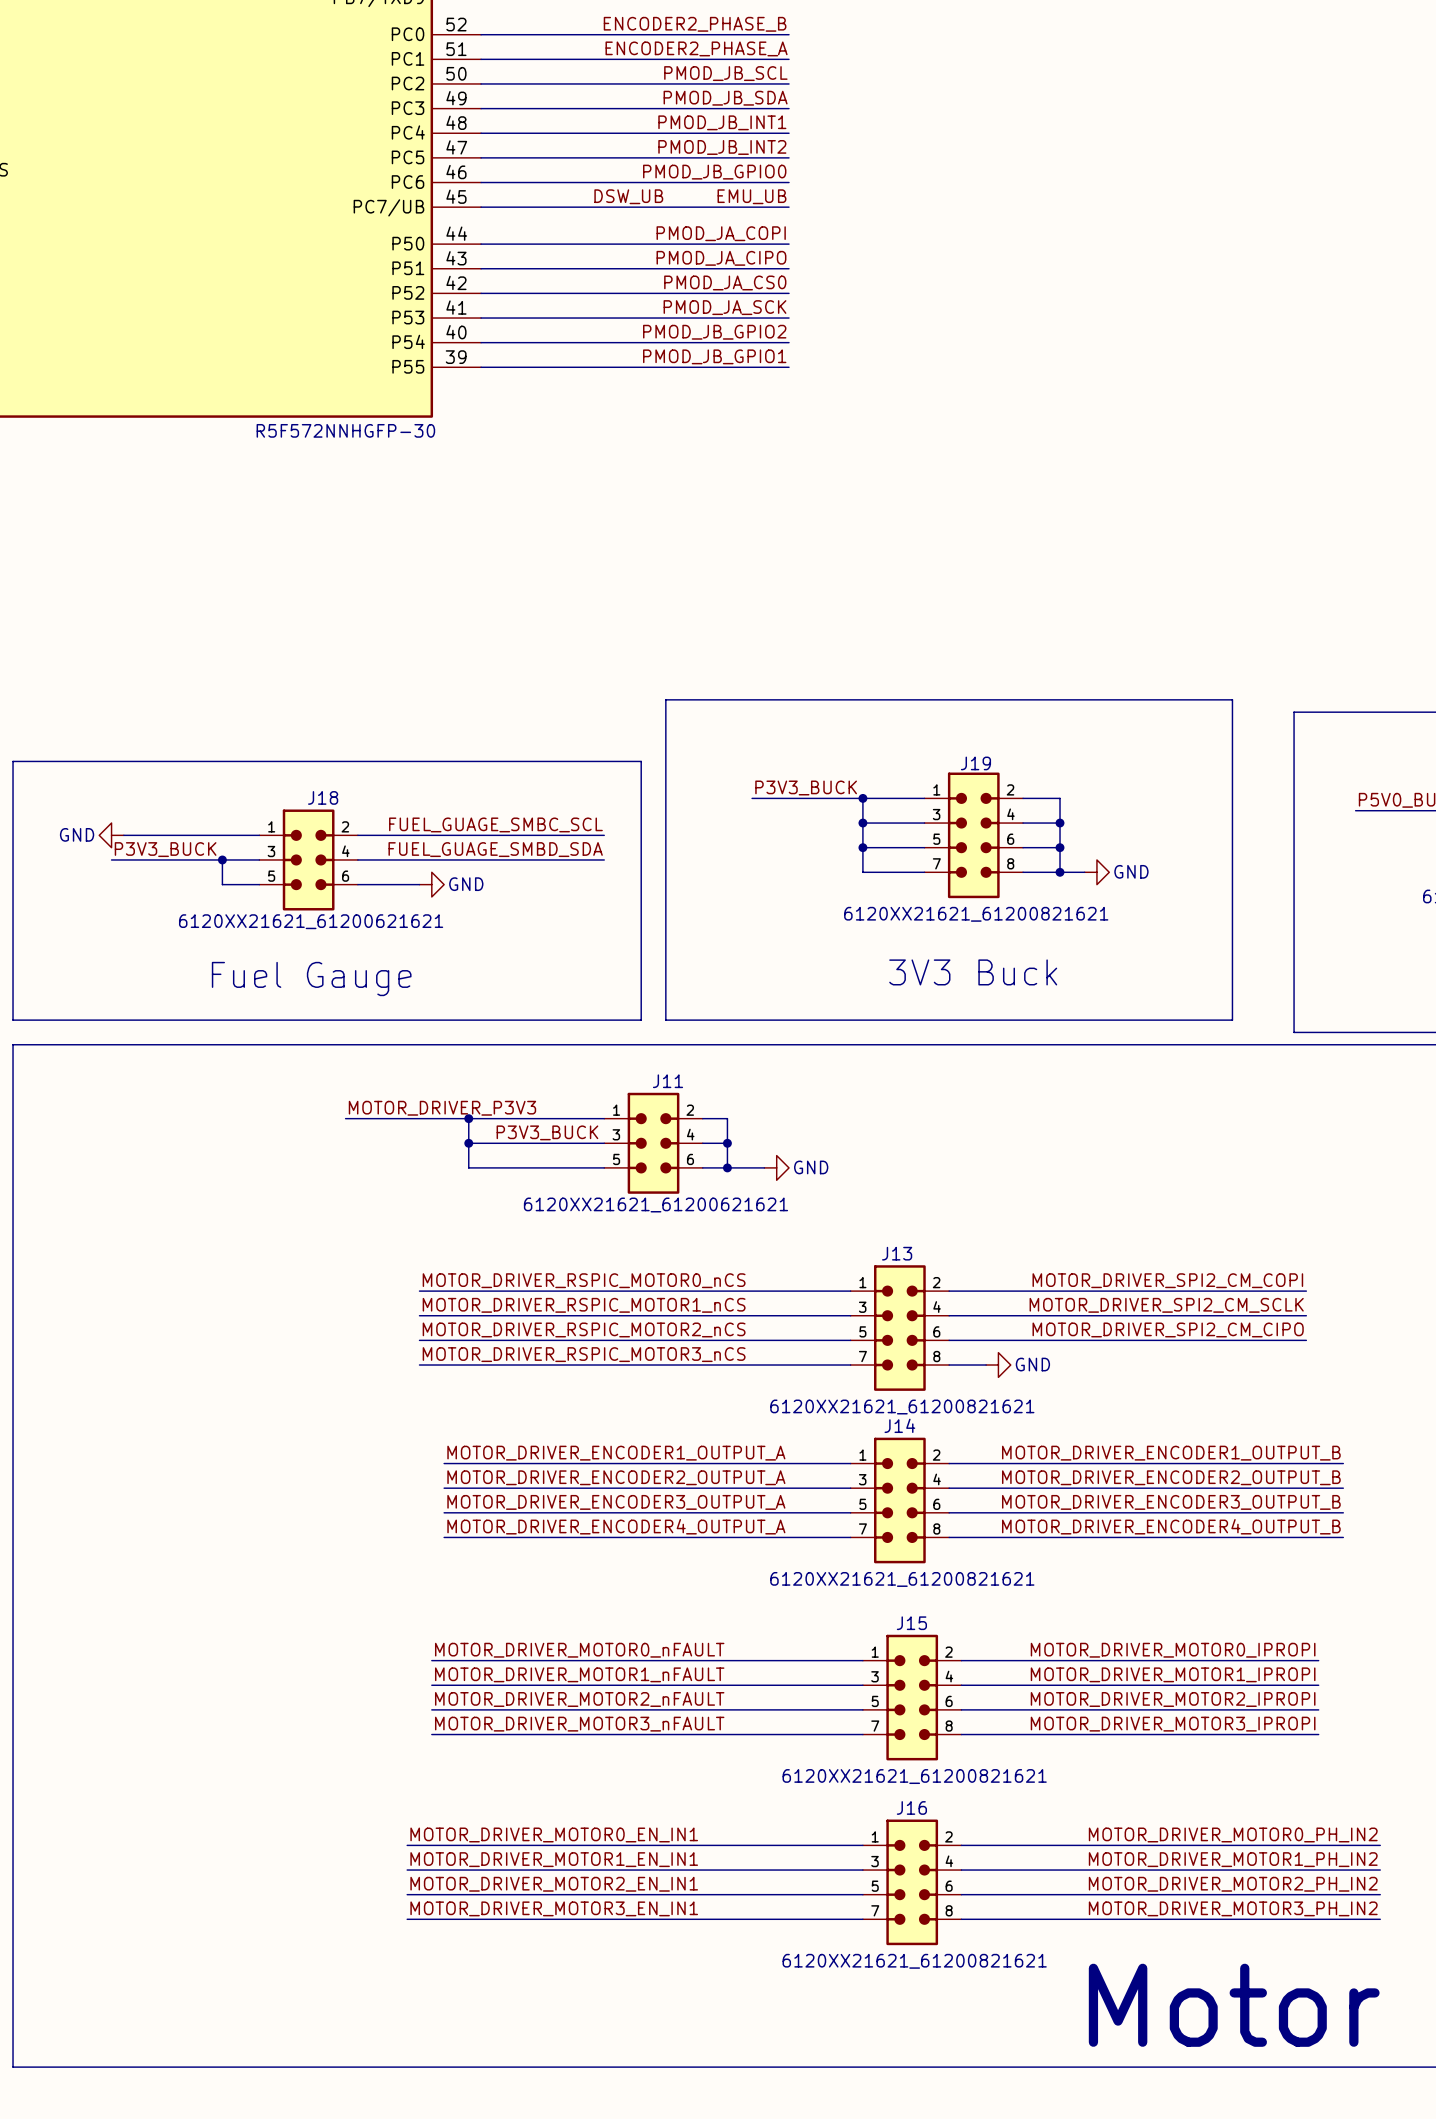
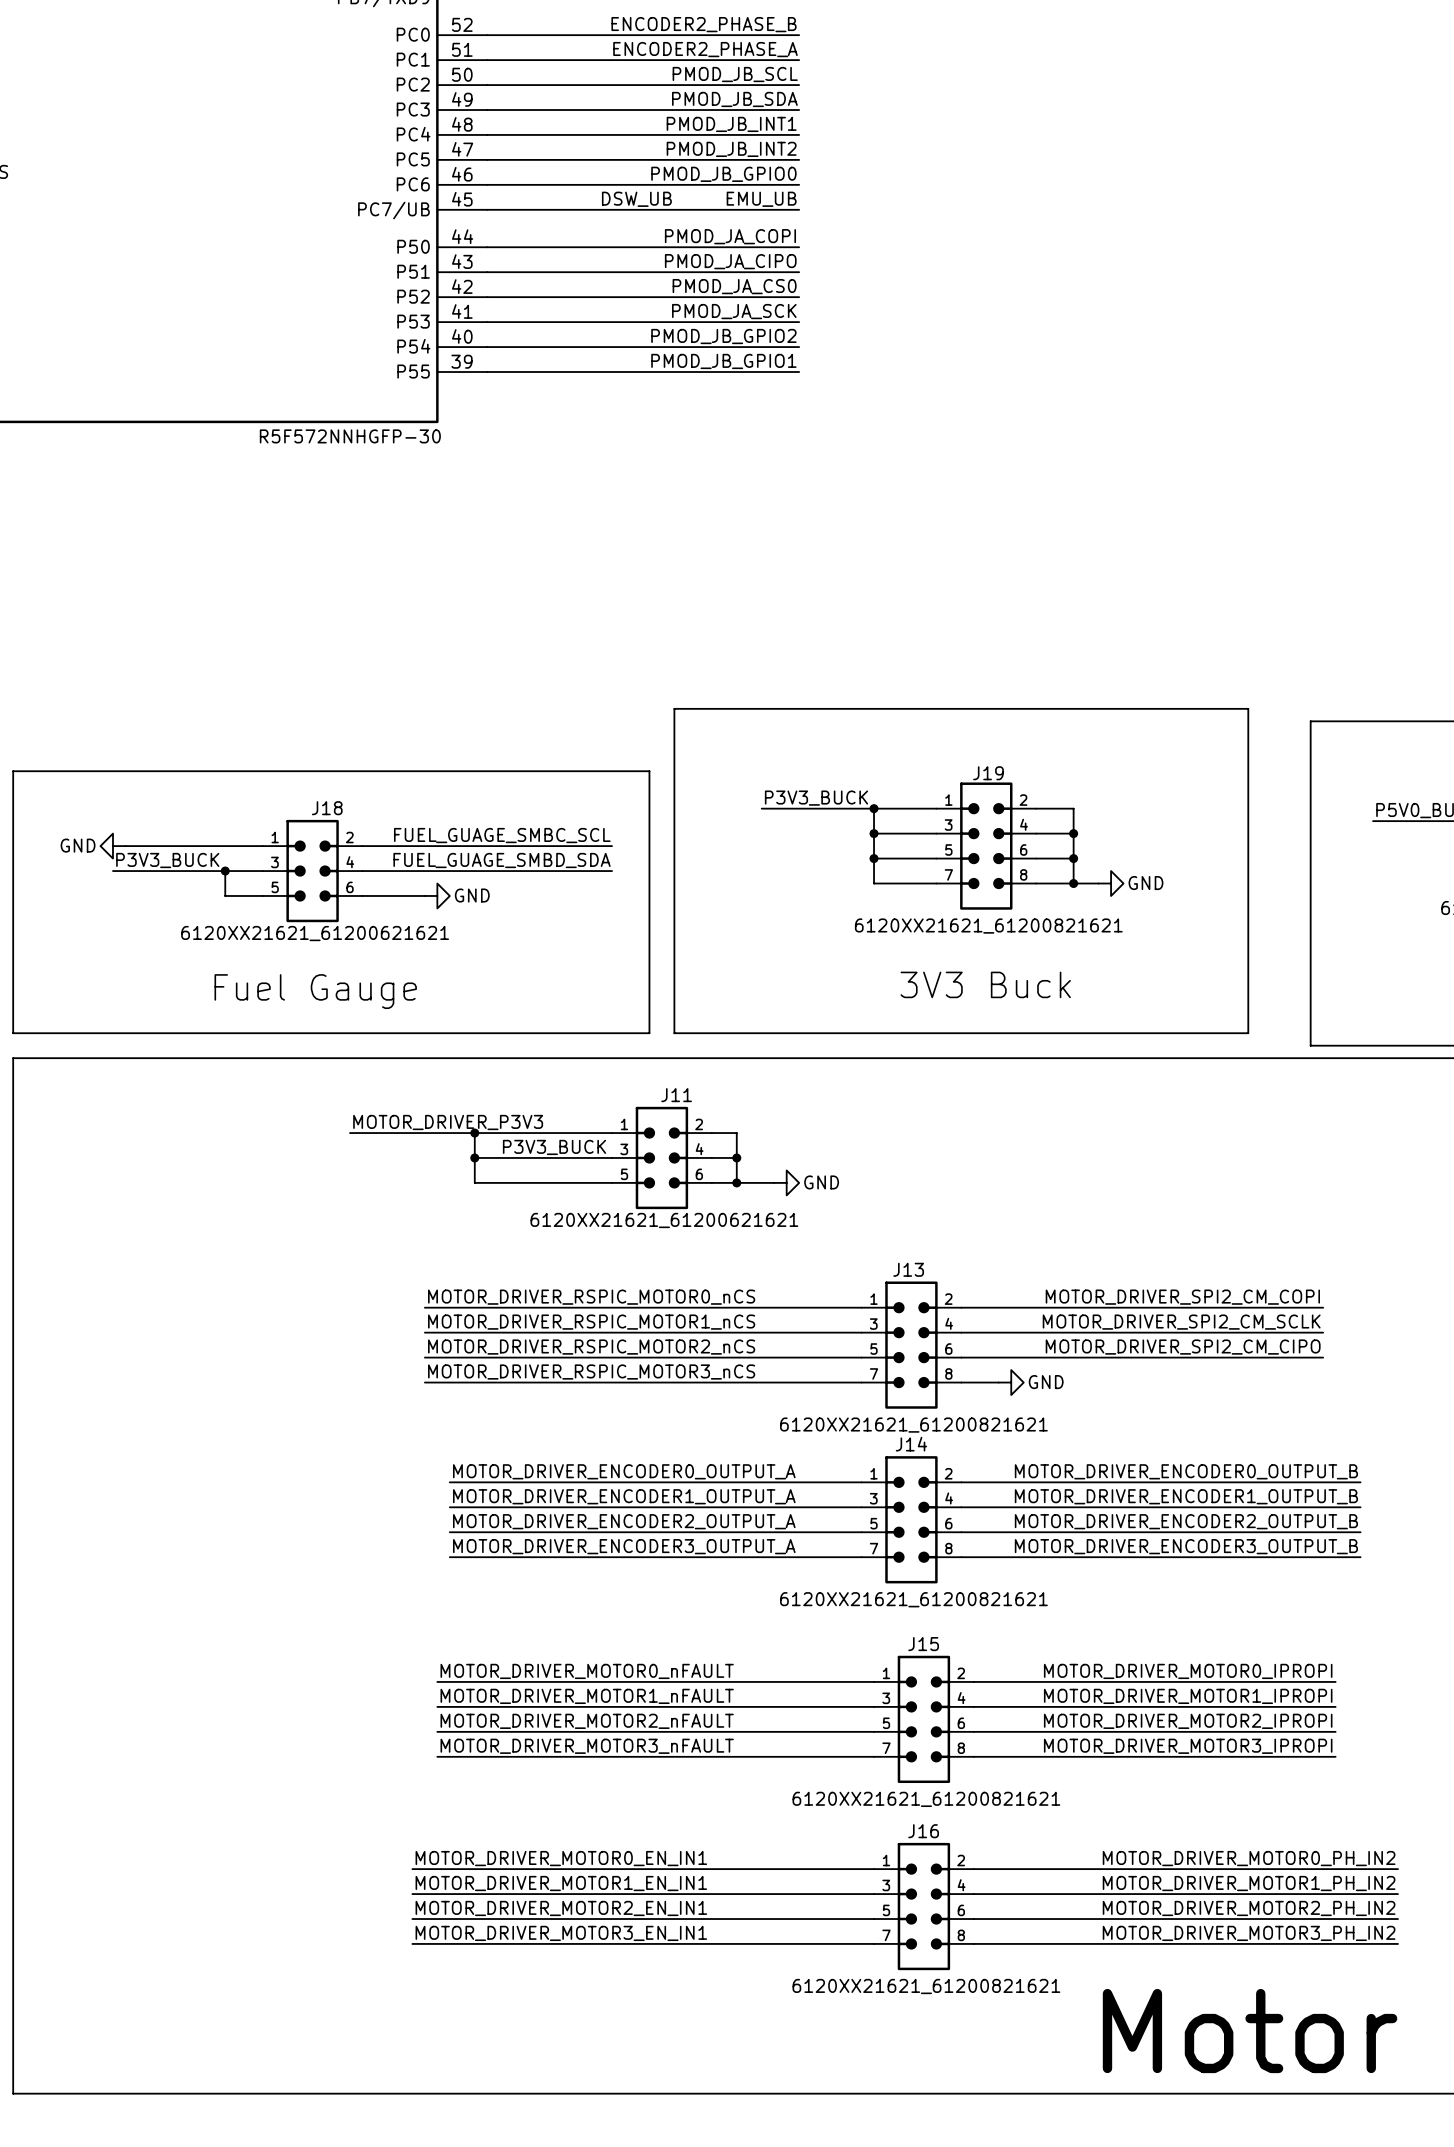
label: MOTOR_DRIVER_ENCODER1_OUTPUT_A (616, 1453) -> MOTOR_DRIVER_ENCODER0_OUTPUT_A (624, 1471)
label: MOTOR_DRIVER_ENCODER1_OUTPUT_B (1171, 1453) -> MOTOR_DRIVER_ENCODER0_OUTPUT_B (1186, 1471)
label: MOTOR_DRIVER_ENCODER2_OUTPUT_A (616, 1477) -> MOTOR_DRIVER_ENCODER1_OUTPUT_A (624, 1496)
label: MOTOR_DRIVER_ENCODER2_OUTPUT_B (1171, 1477) -> MOTOR_DRIVER_ENCODER1_OUTPUT_B (1186, 1496)
label: MOTOR_DRIVER_ENCODER3_OUTPUT_A (616, 1502) -> MOTOR_DRIVER_ENCODER2_OUTPUT_A (624, 1521)
label: MOTOR_DRIVER_ENCODER3_OUTPUT_B (1171, 1502) -> MOTOR_DRIVER_ENCODER2_OUTPUT_B (1186, 1521)
label: MOTOR_DRIVER_ENCODER4_OUTPUT_A (616, 1526) -> MOTOR_DRIVER_ENCODER3_OUTPUT_A (624, 1546)
label: MOTOR_DRIVER_ENCODER4_OUTPUT_B (1171, 1526) -> MOTOR_DRIVER_ENCODER3_OUTPUT_B (1186, 1546)

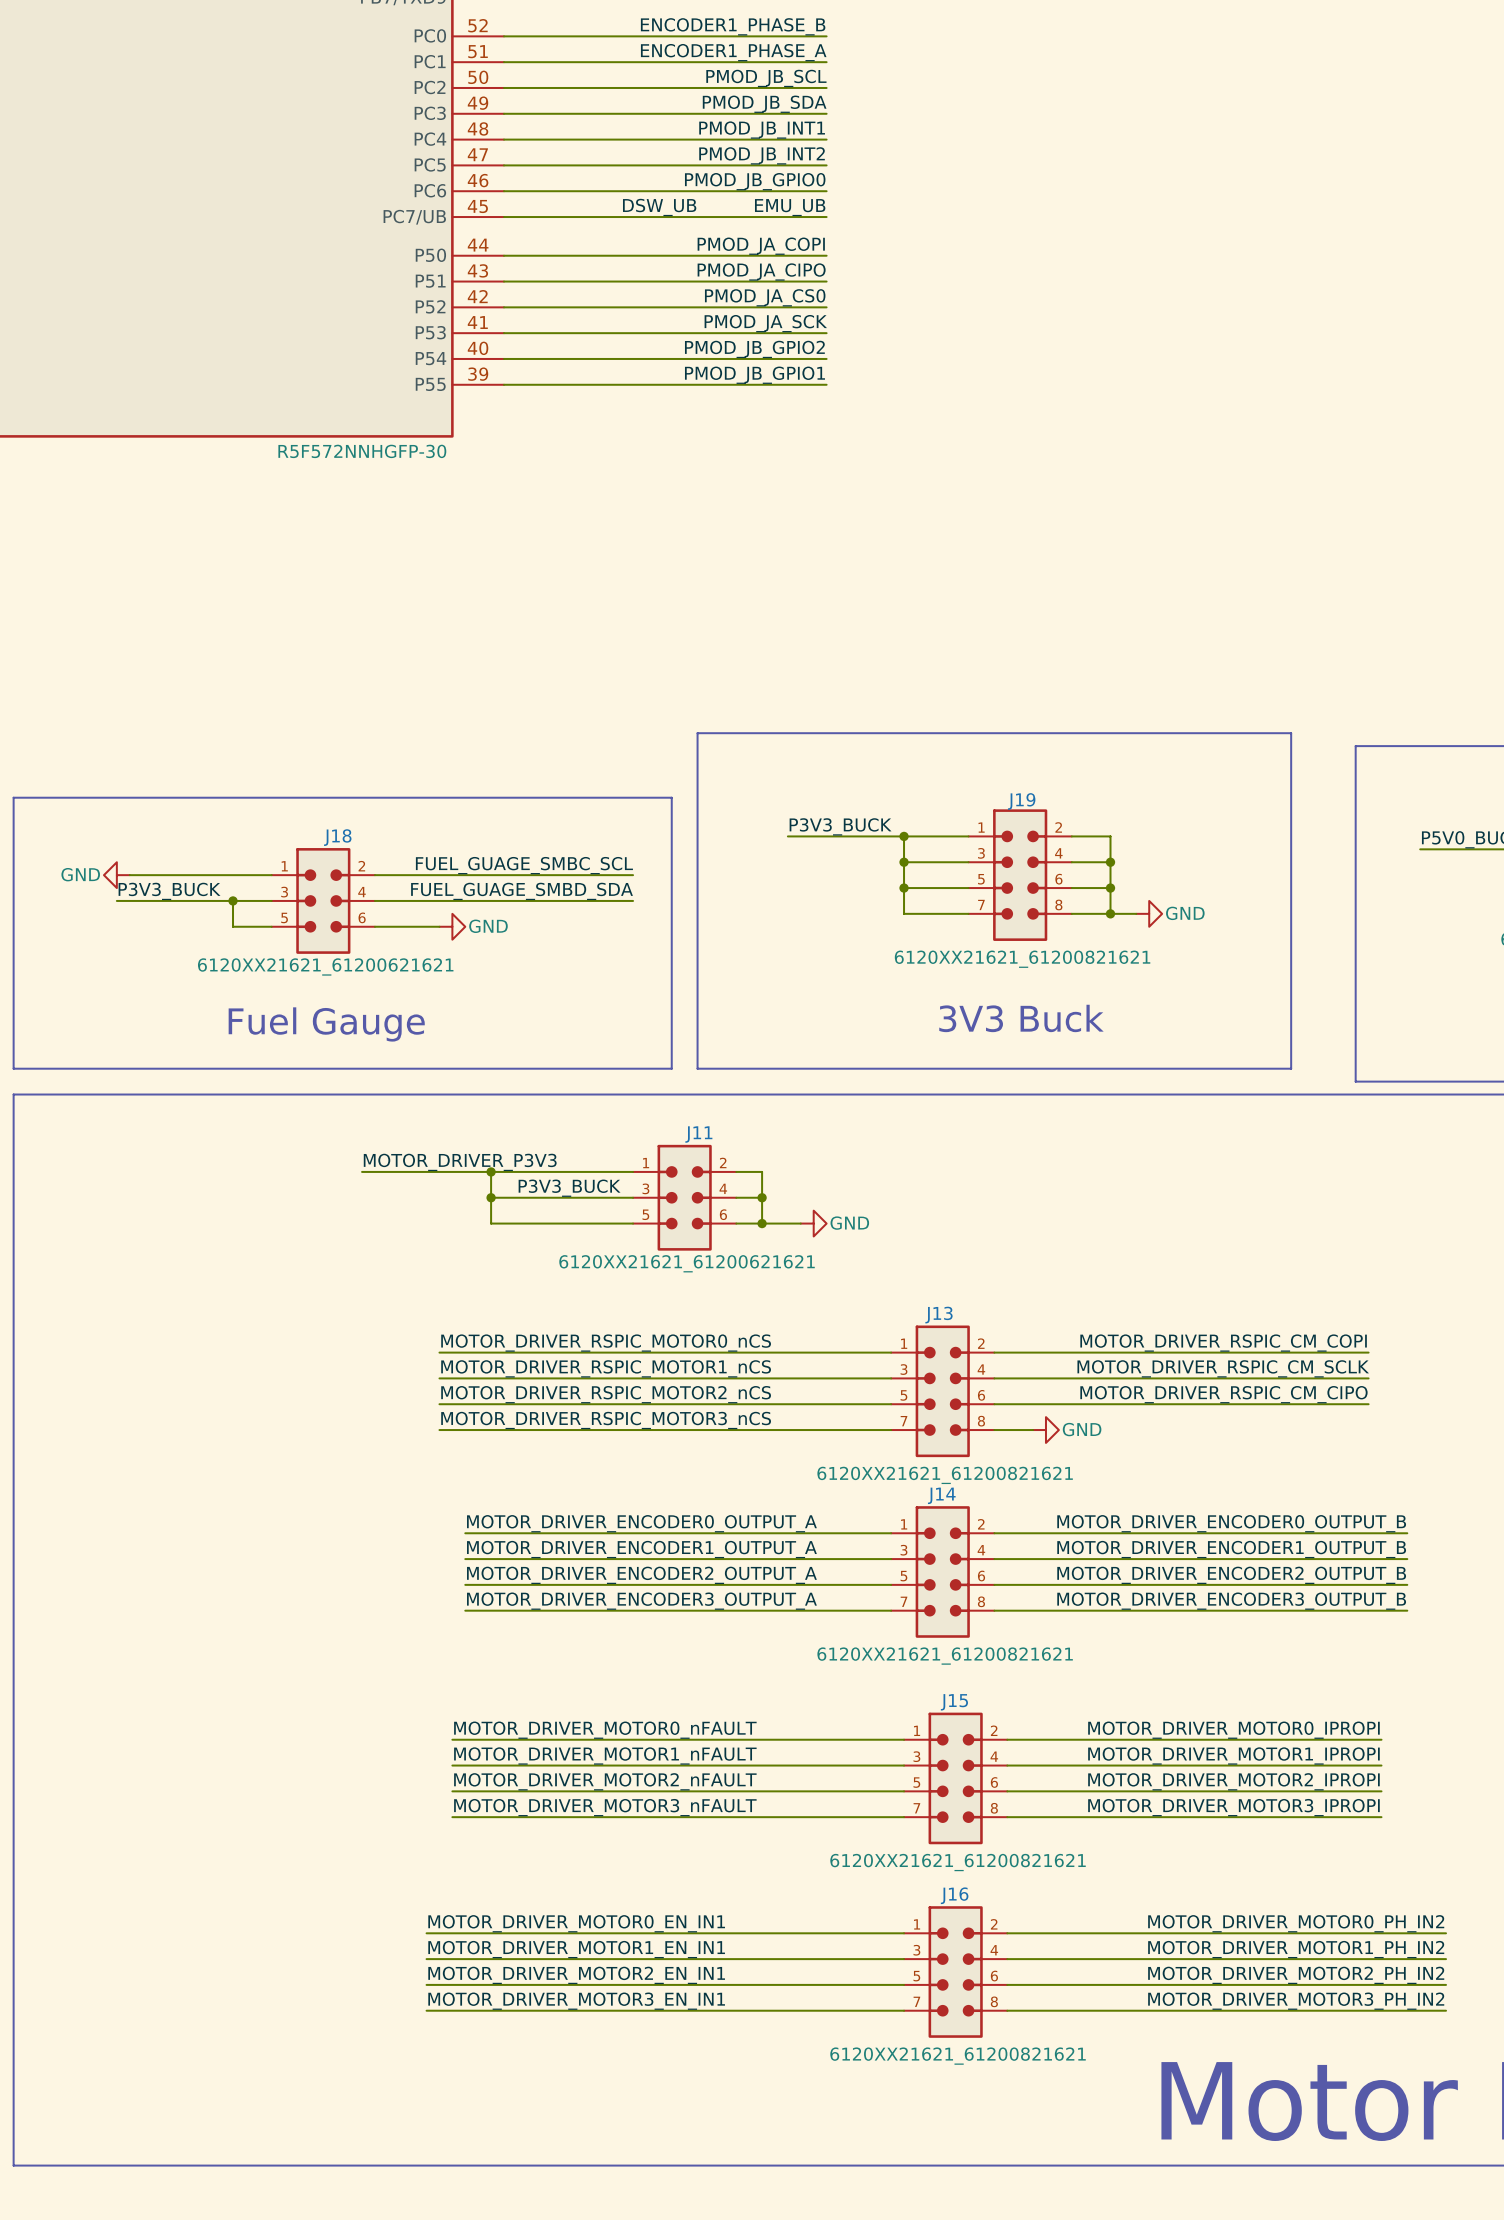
label: ENCODER2_PHASE_B (704, 24) -> ENCODER1_PHASE_B (733, 26)
label: ENCODER2_PHASE_A (705, 49) -> ENCODER1_PHASE_A (733, 52)
label: MOTOR_DRIVER_SPI2_CM_COPI (1182, 1297) -> MOTOR_DRIVER_RSPIC_CM_COPI (1223, 1343)
label: MOTOR_DRIVER_SPI2_CM_SCLK (1181, 1322) -> MOTOR_DRIVER_RSPIC_CM_SCLK (1223, 1368)
label: MOTOR_DRIVER_SPI2_CM_CIPO (1183, 1347) -> MOTOR_DRIVER_RSPIC_CM_CIPO (1223, 1394)

